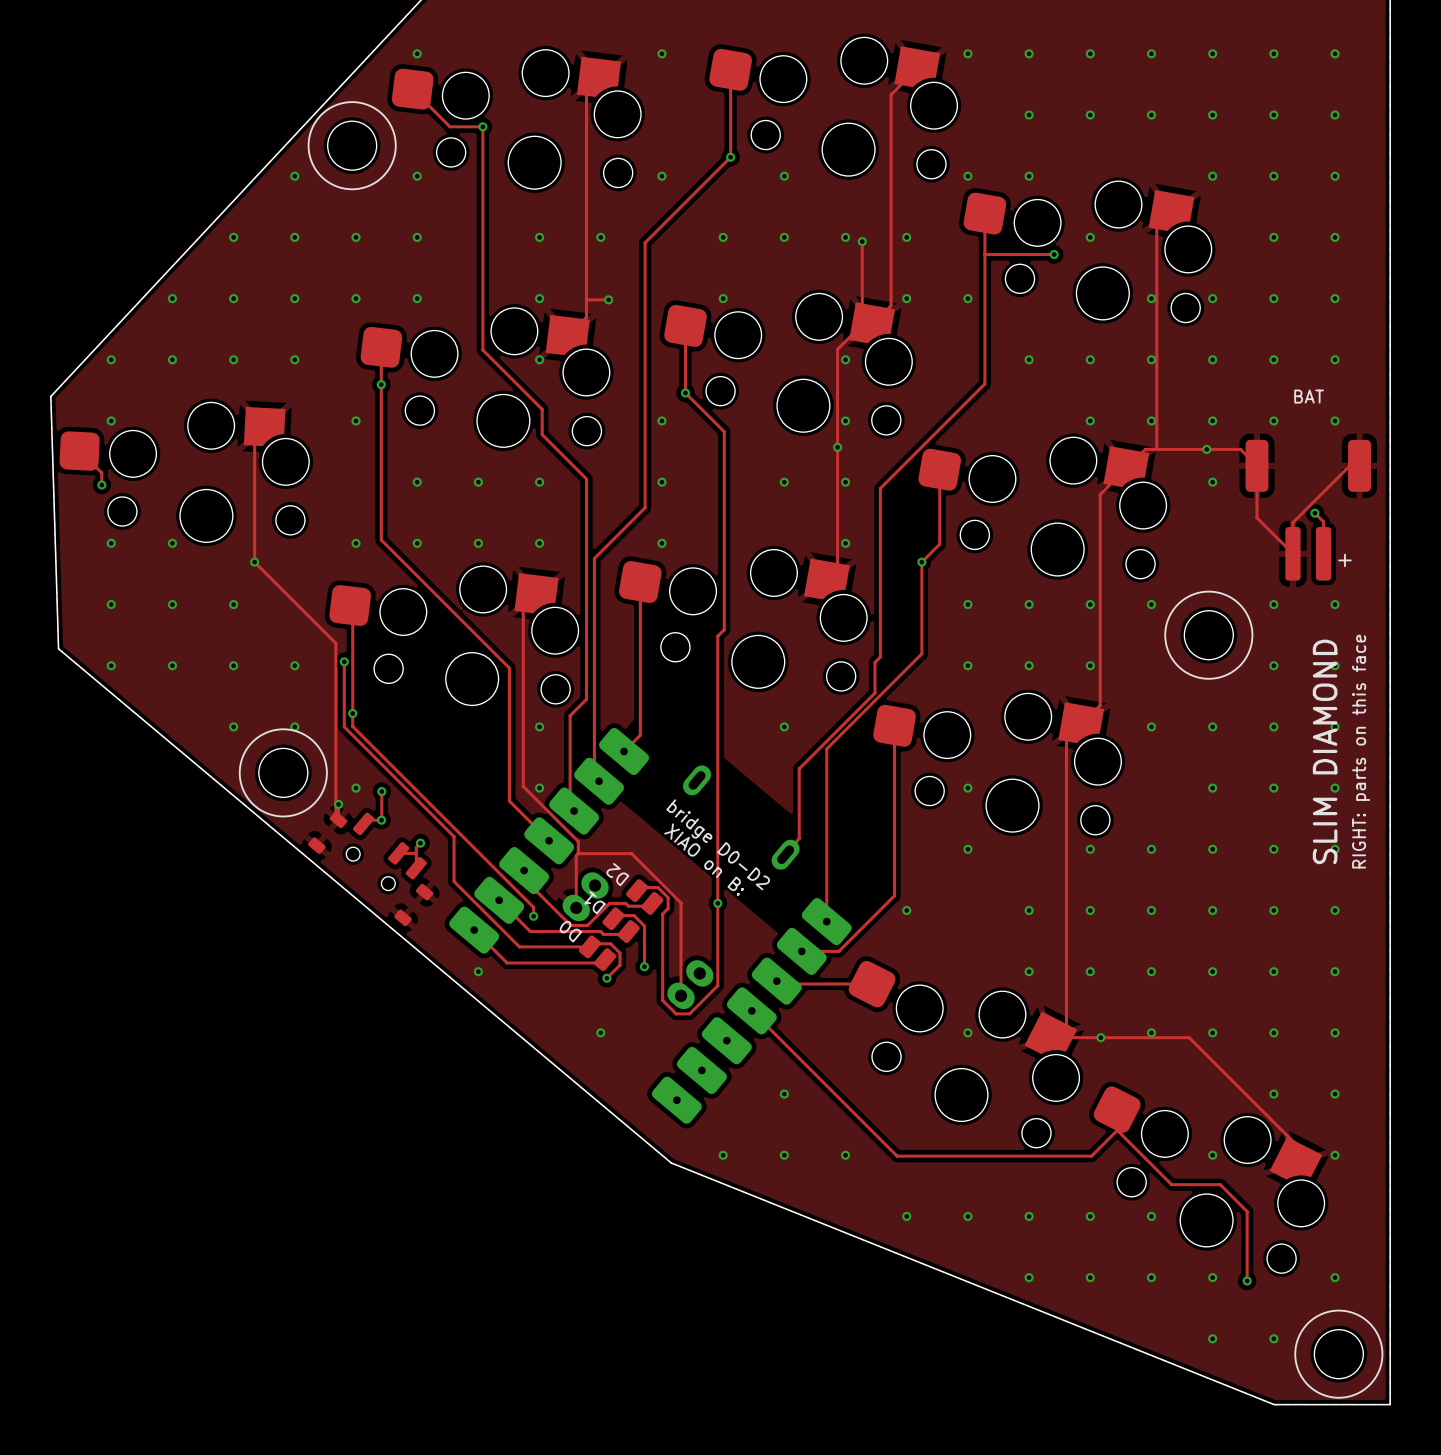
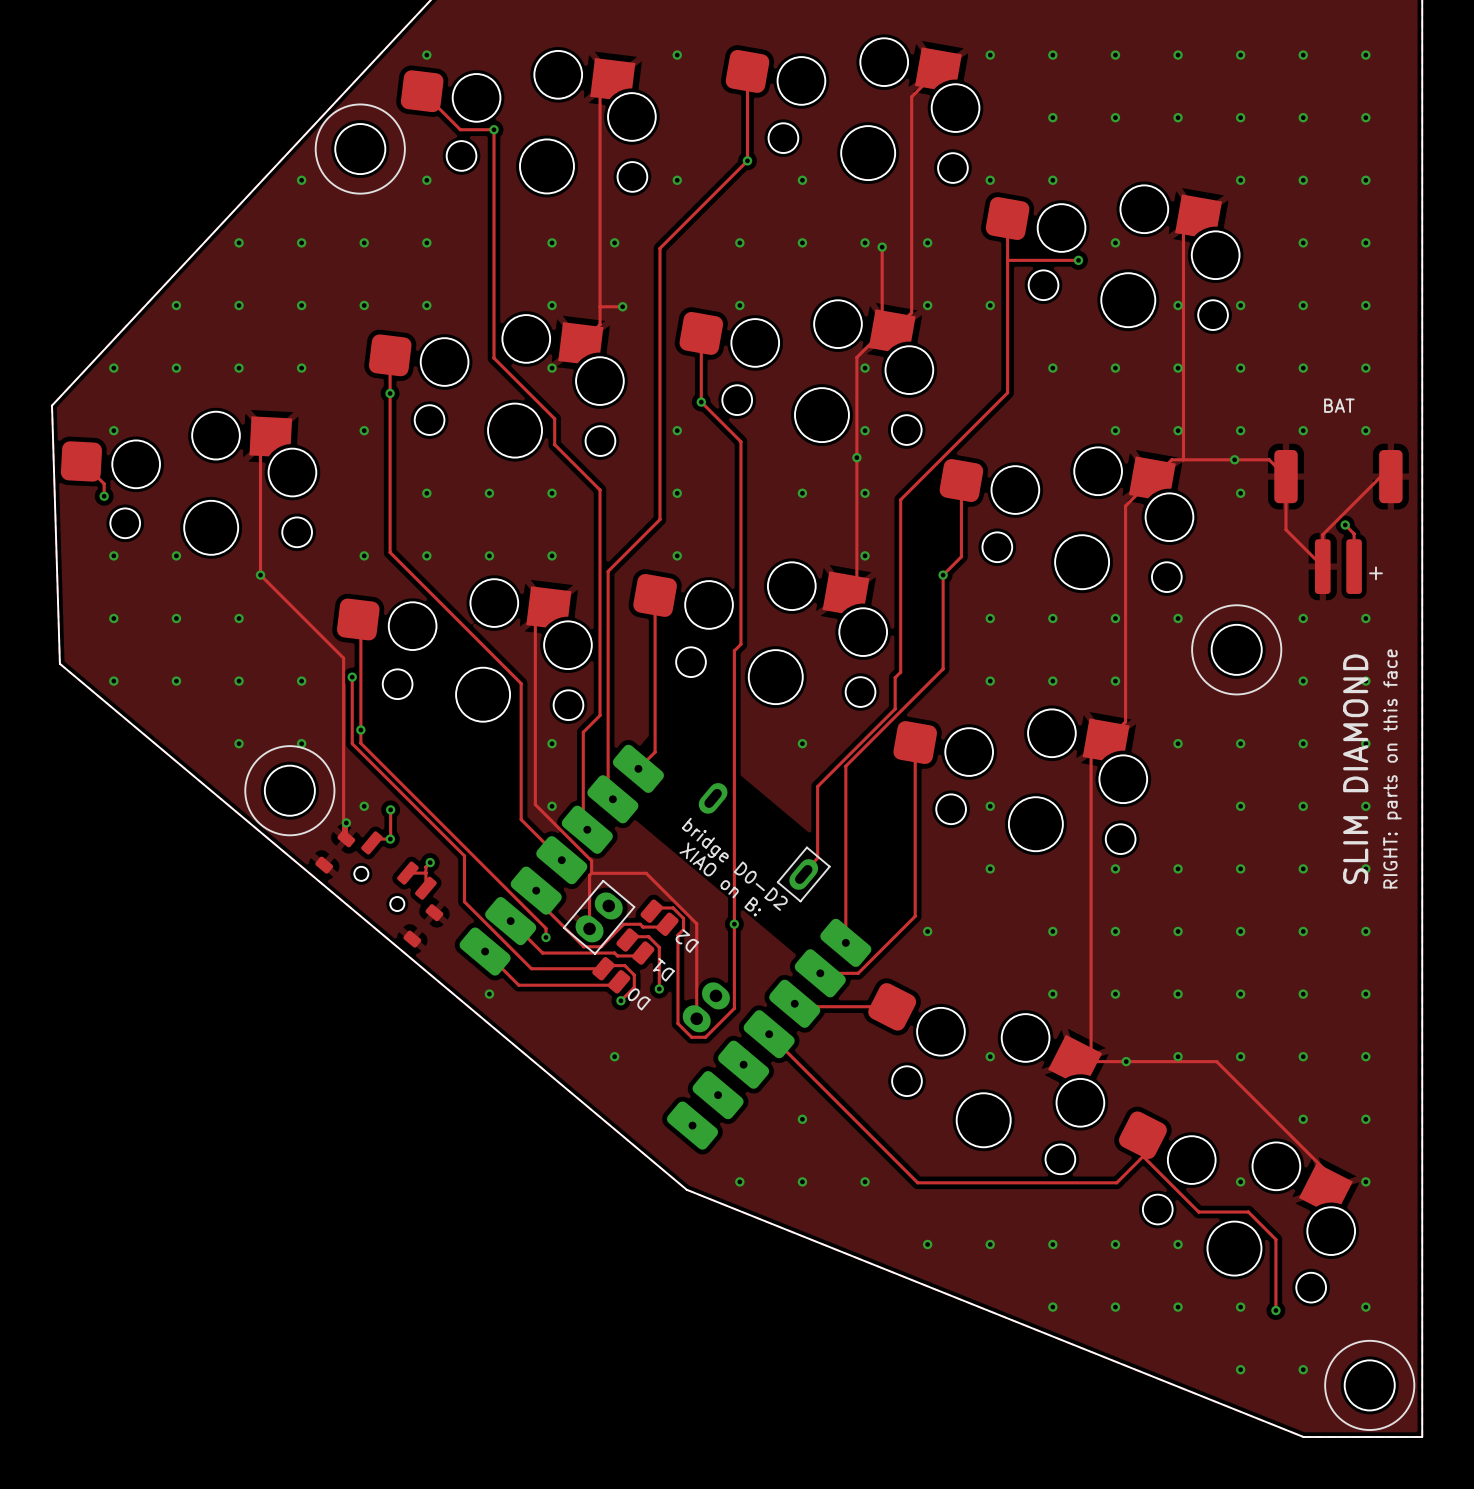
part footprint: [449, 727, 852, 1124] -> [459, 744, 872, 1150]
text position: D2 (617, 874) -> D2 (687, 941)
text position: D1 (594, 902) -> D1 (663, 969)
text position: D0 (570, 931) -> D0 (639, 999)

